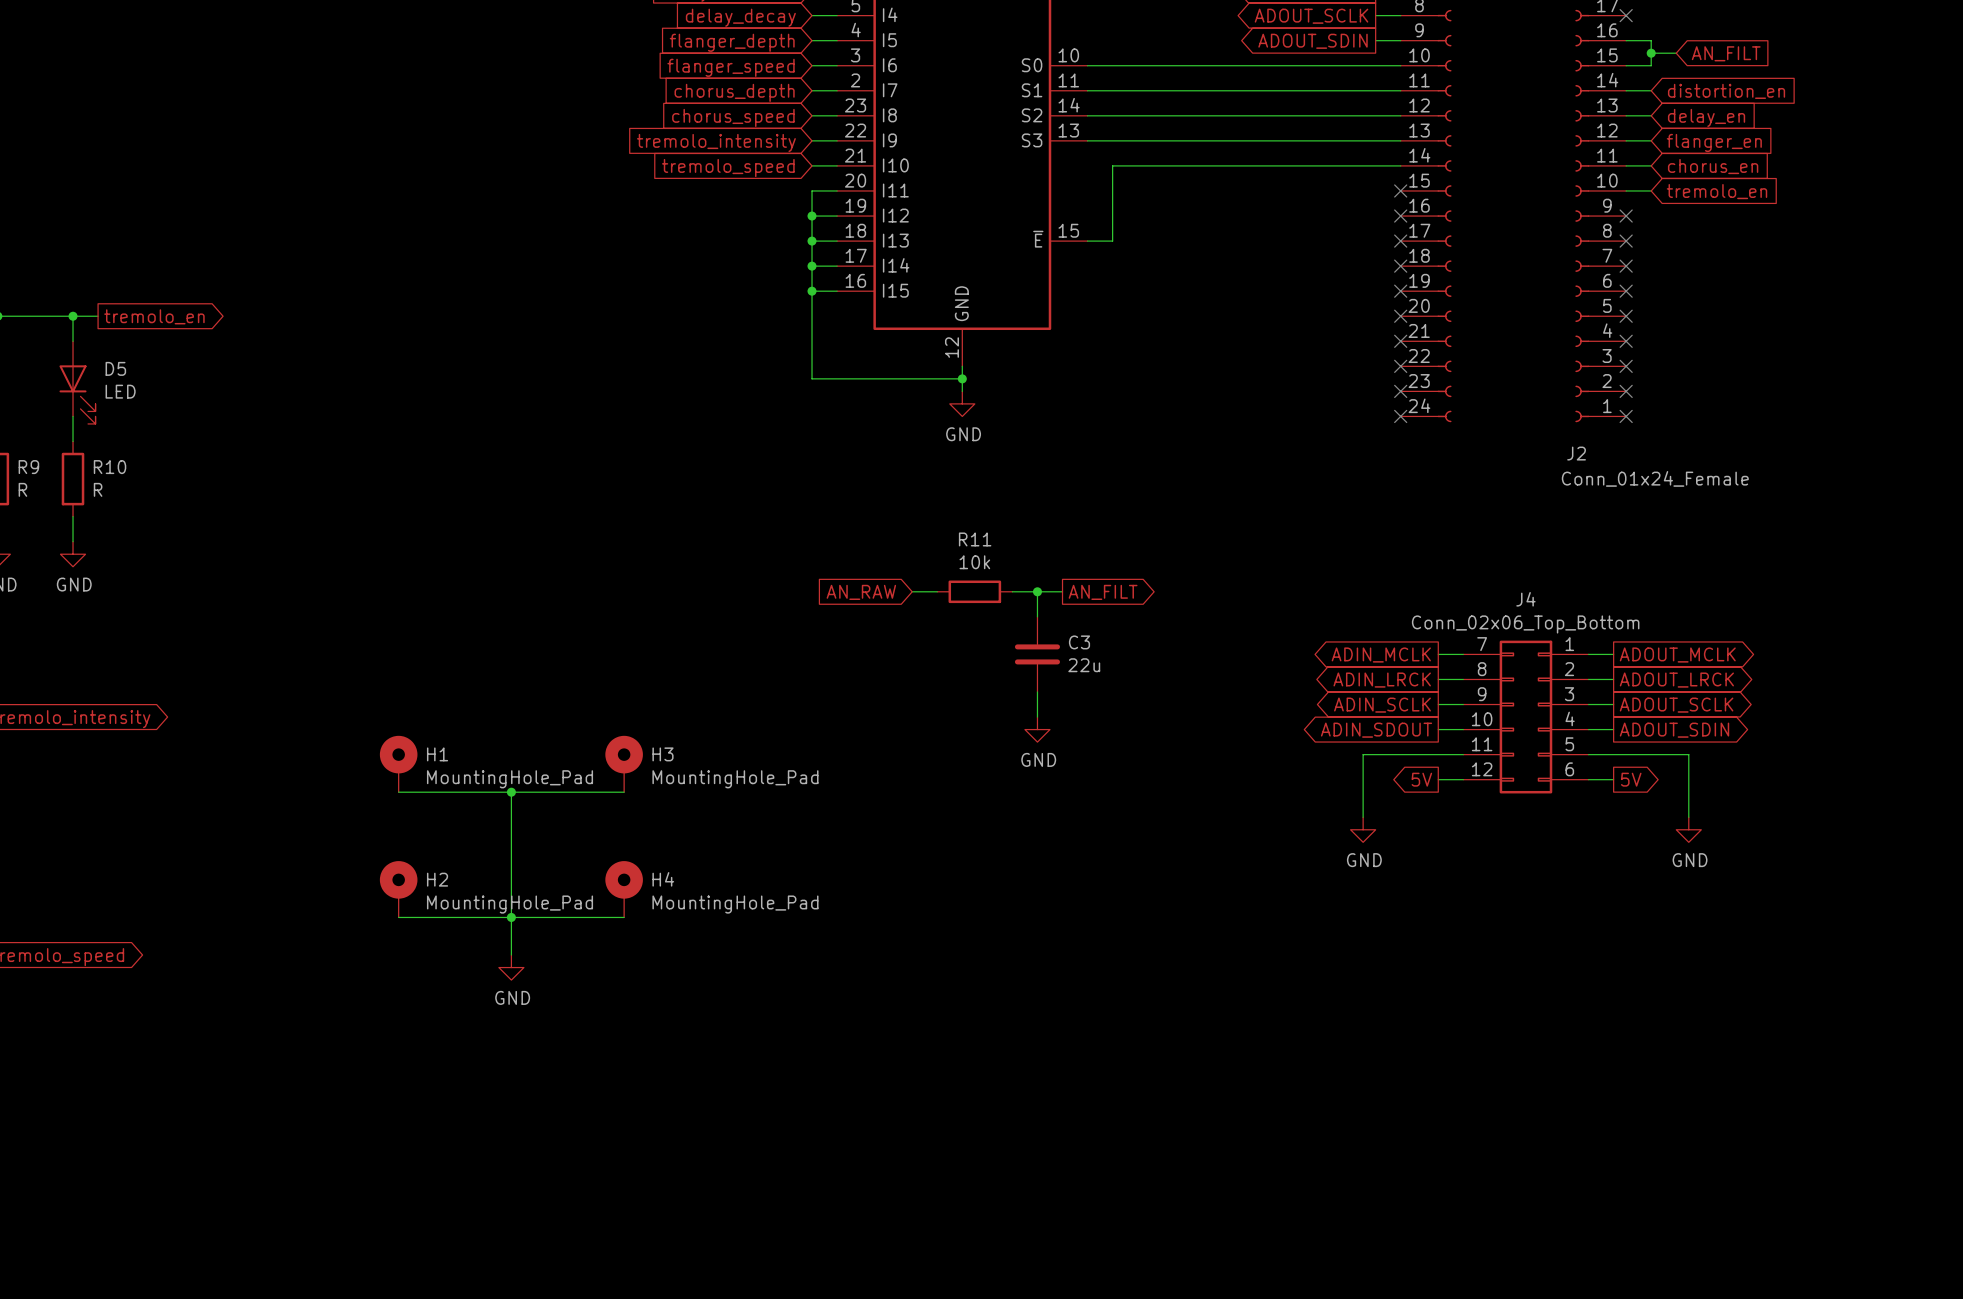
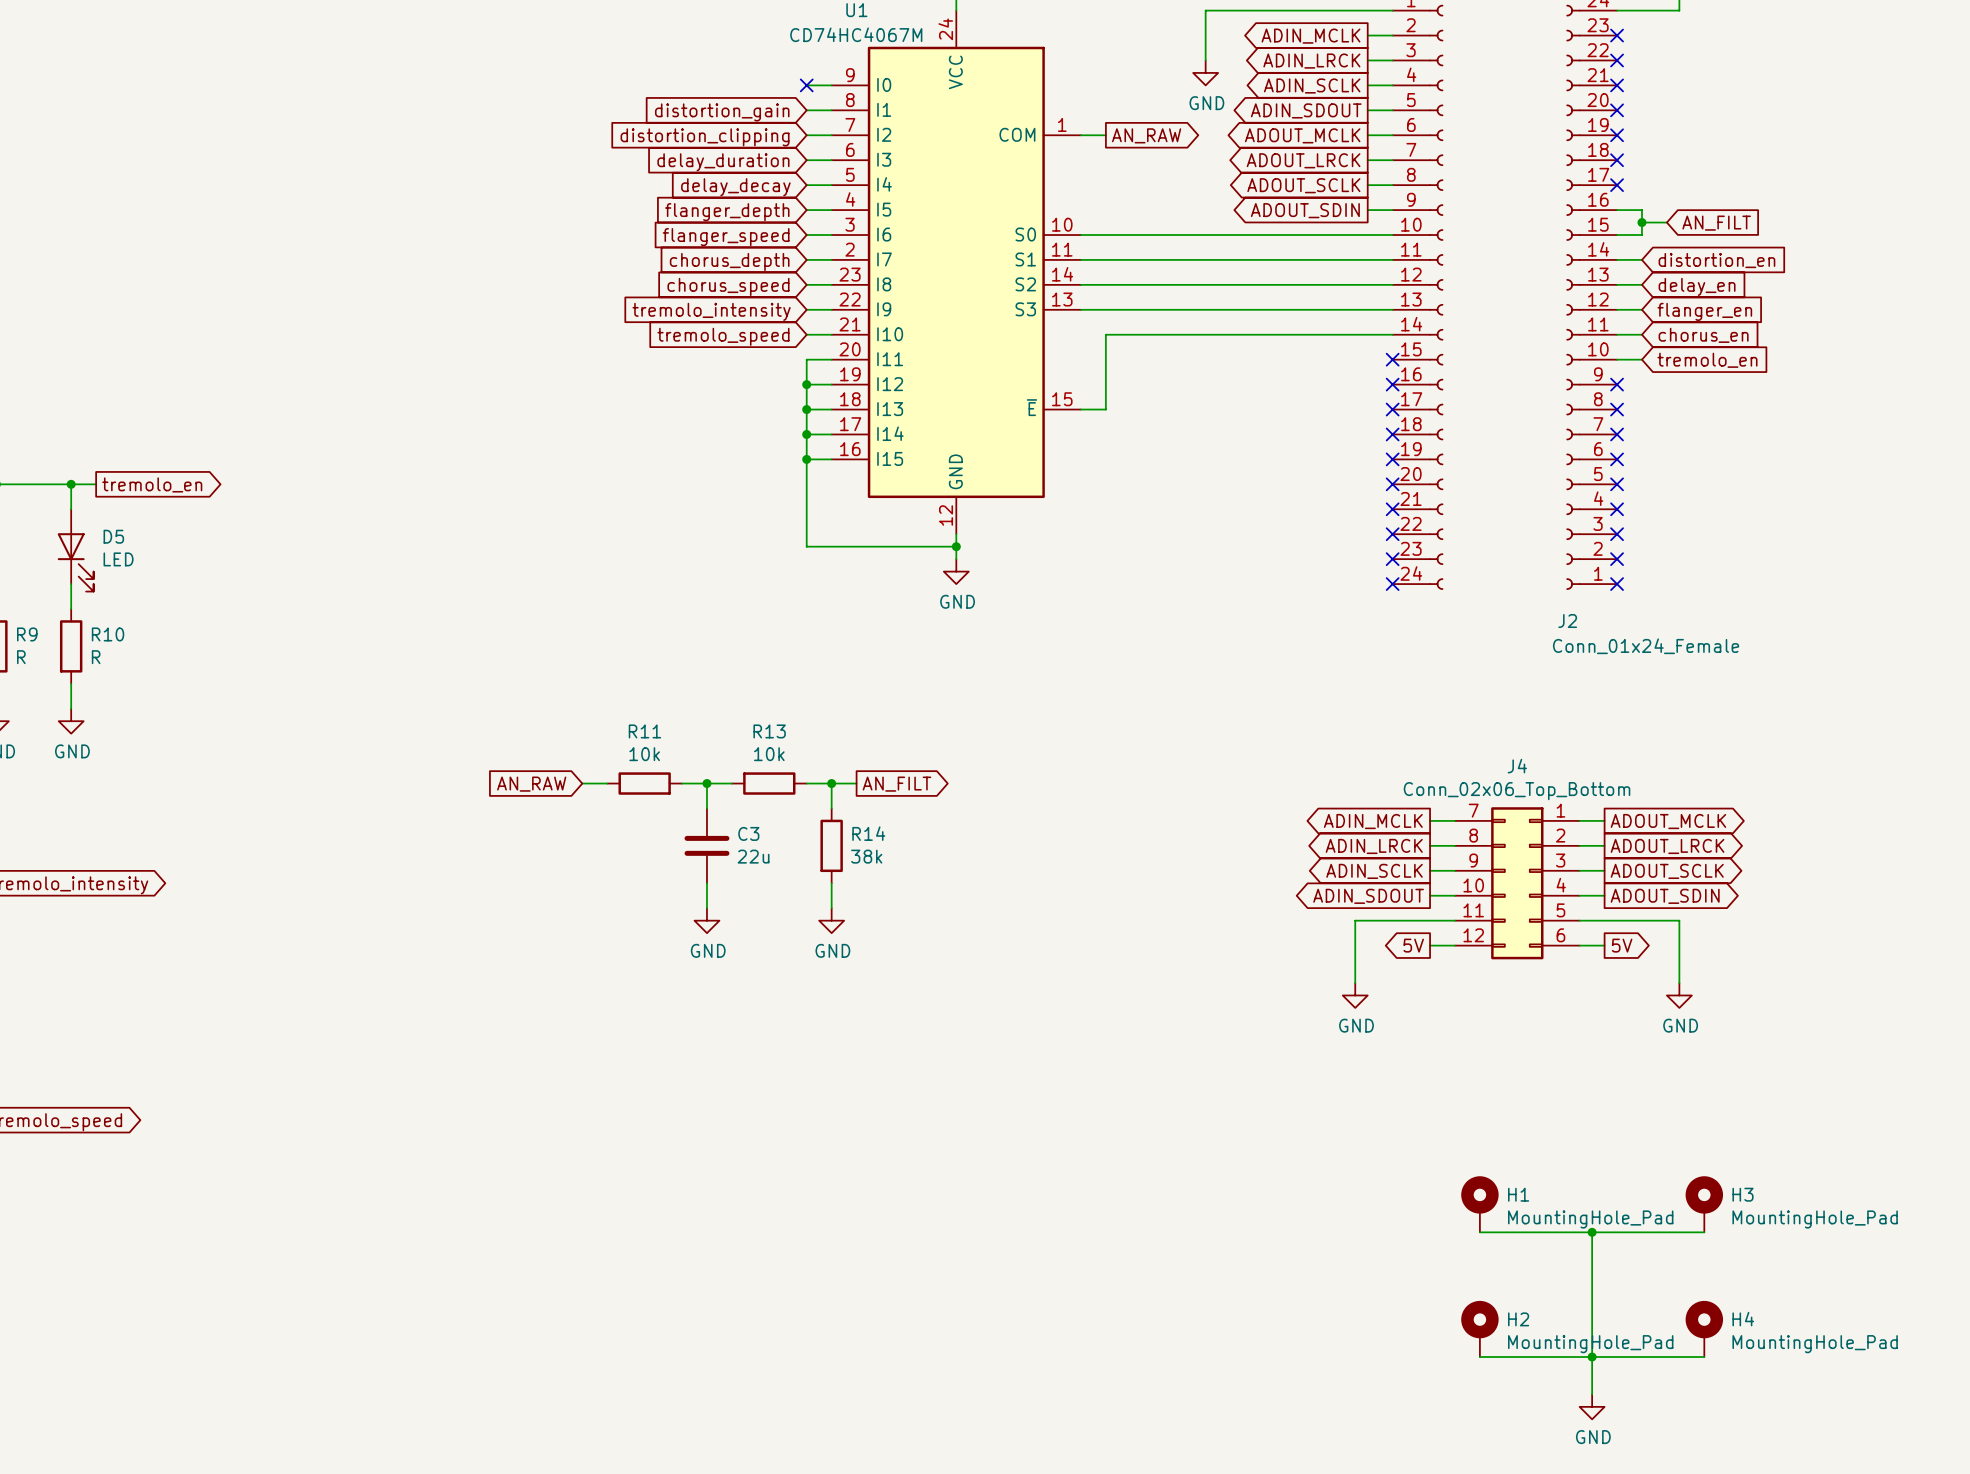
wire: (912, 591) (937, 591) -> none
R11 position: (974, 591) -> (644, 783)
wire: (1012, 591) (1062, 591) -> (806, 783) (856, 783)
wire: (1037, 591) (1037, 616) -> (831, 783) (831, 808)
junction: (1037, 591) -> none
global label: AN_RAW (861, 592) -> none
global label position: AN_FILT (1103, 592) -> AN_FILT (896, 784)
wire: none -> (582, 783) (607, 783)
wire: none -> (682, 783) (731, 783)
wire: none -> (706, 783) (706, 808)
junction: none -> (706, 783)
R13: none -> 10k (769, 783)
junction: none -> (831, 783)
global label: none -> AN_RAW (531, 784)
C3 position: (1037, 654) -> (706, 845)
R14: none -> 38k (831, 845)
wire: (1037, 692) (1037, 717) -> (831, 883) (831, 908)
wire: none -> (706, 883) (706, 908)
power symbol: GND (1037, 729) -> none
power symbol: none -> GND (706, 920)
power symbol: none -> GND (831, 920)
H1 position: (398, 764) -> (1479, 1204)
H3 position: (624, 764) -> (1704, 1204)
wire: (398, 792) (624, 792) -> none
wire: (511, 792) (511, 955) -> none
junction: (511, 792) -> none
H2 position: (398, 889) -> (1479, 1328)
H4 position: (624, 889) -> (1704, 1328)
wire: (398, 917) (624, 917) -> none
junction: (511, 917) -> none
power symbol: GND (511, 967) -> none
wire: none -> (1479, 1232) (1704, 1232)
wire: none -> (1592, 1232) (1592, 1394)
junction: none -> (1592, 1232)
wire: none -> (1479, 1357) (1704, 1357)
junction: none -> (1592, 1357)
power symbol: none -> GND (1592, 1406)

